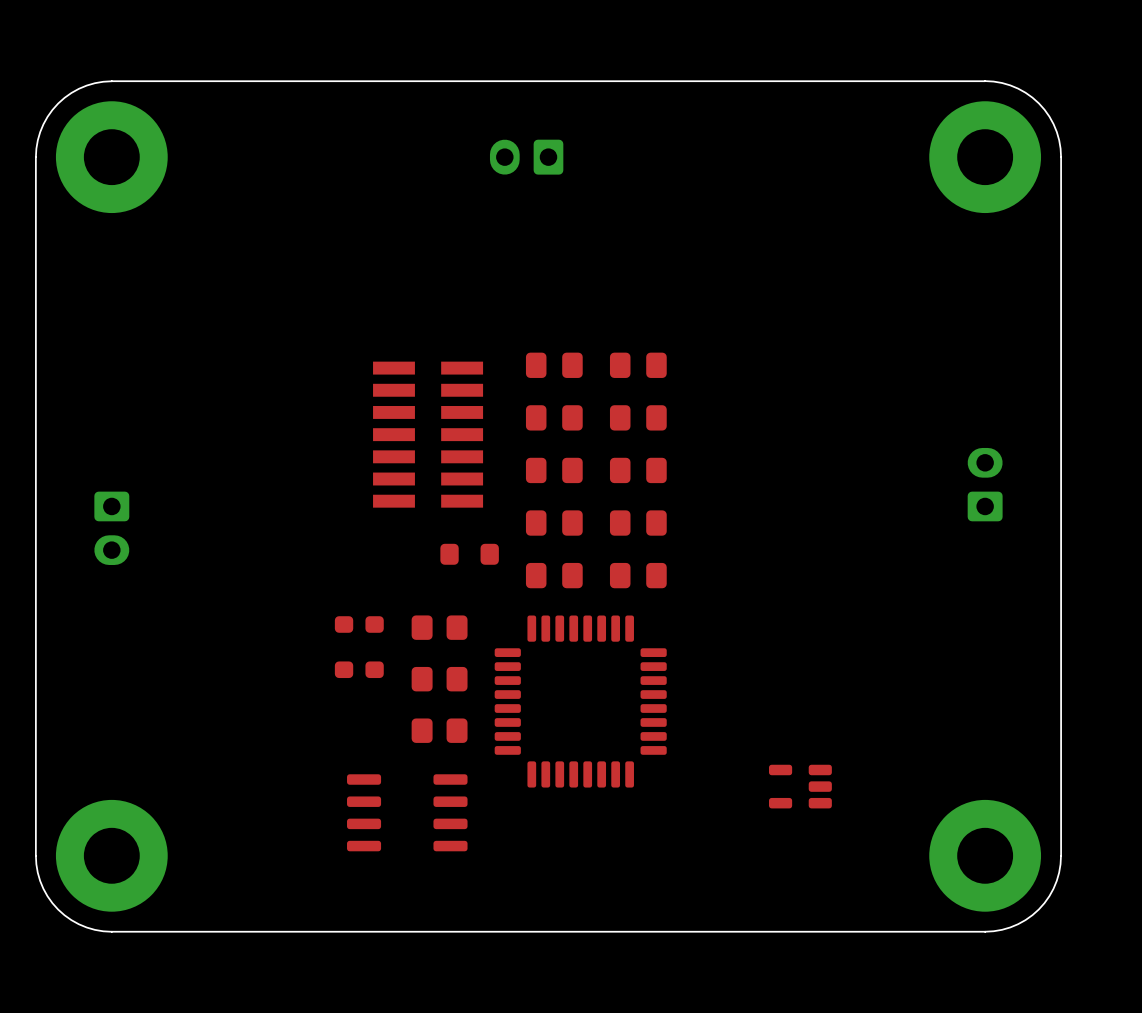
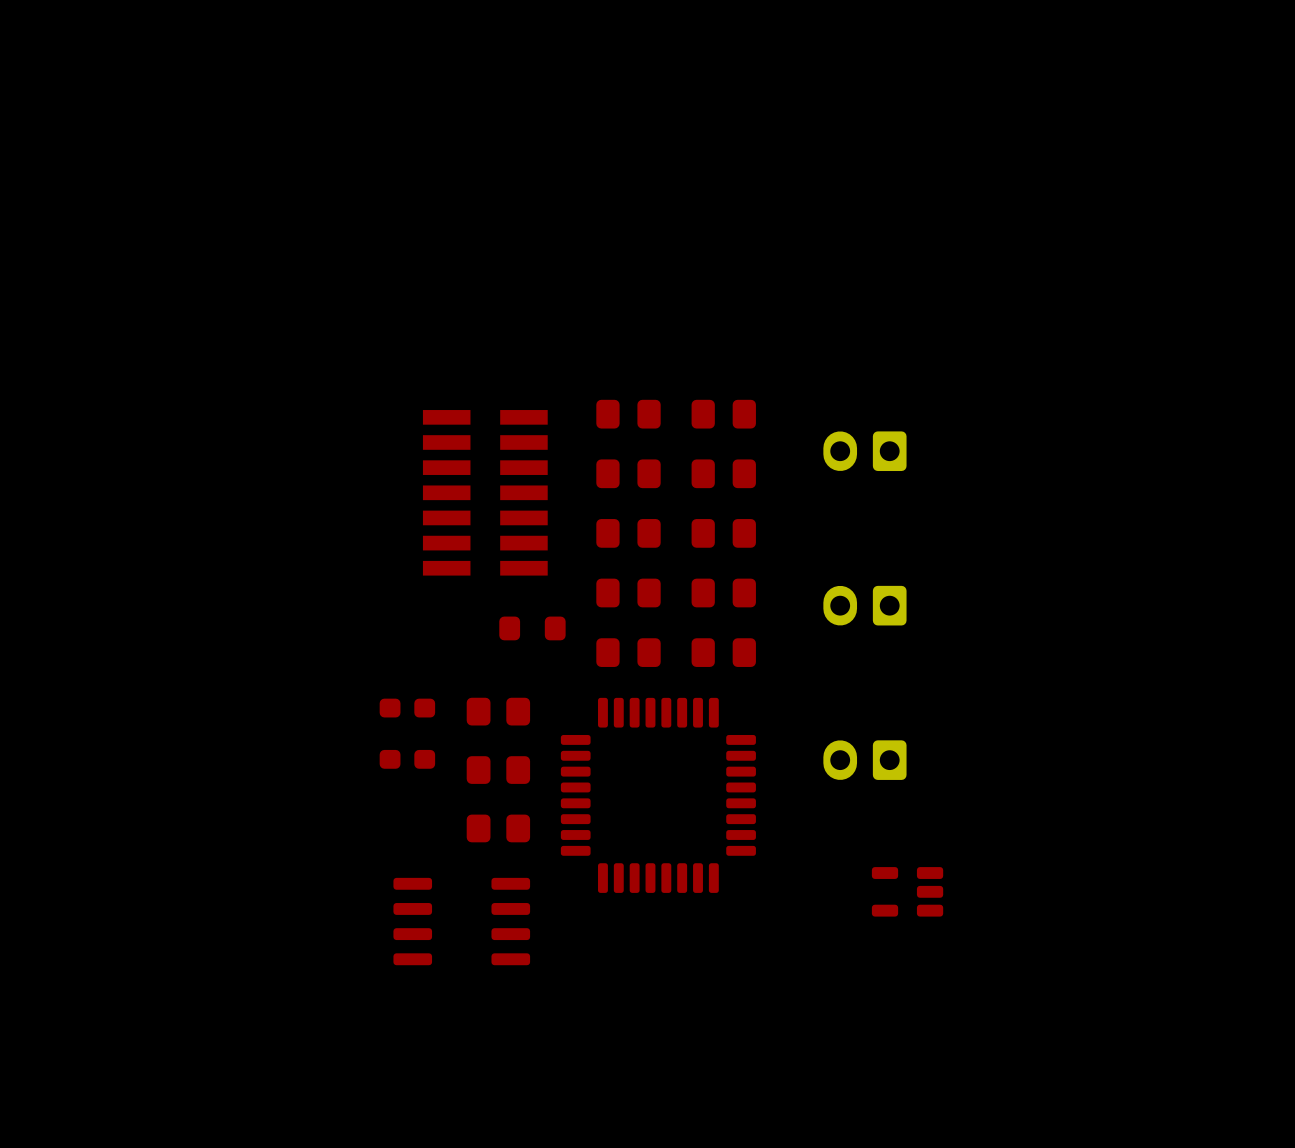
board edge: (985, 81) (1010, 85) (1032, 97) (1049, 116) (1056, 132) (1060, 148) (1061, 855) -> none
board edge: (985, 81) (111, 81) (94, 83) (78, 88) (58, 103) (43, 124) (37, 140) (35, 157) (36, 864) (43, 888) (58, 909) (78, 924) (94, 929) (111, 931) -> none
part: (111, 157) -> none
part: (526, 157) -> none
part: (985, 157) -> none
part: none -> (864, 451)
part: (985, 484) -> none
part: (111, 528) -> none
part: none -> (864, 605)
part: none -> (864, 760)
part: (111, 855) -> none
part: (985, 855) -> none
board edge: (1061, 855) (1059, 872) (1053, 888) (1038, 909) (1018, 924) (993, 931) (111, 931) -> none

